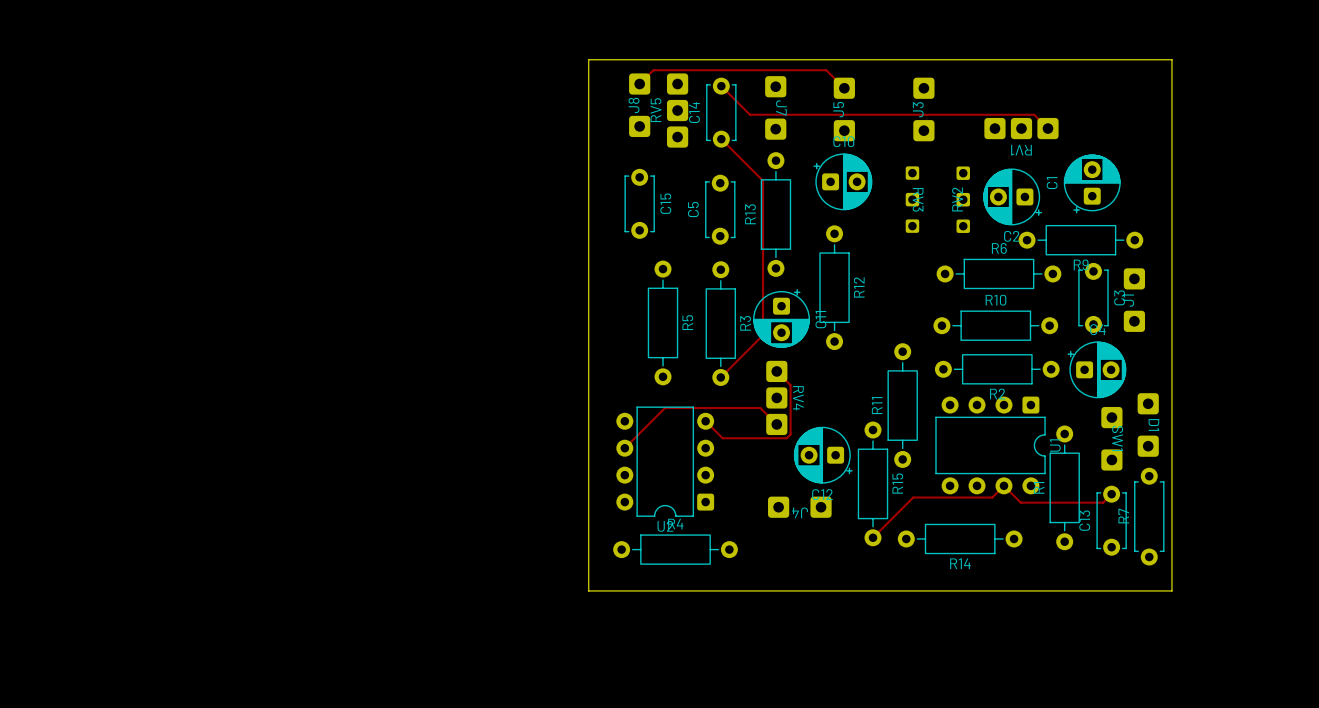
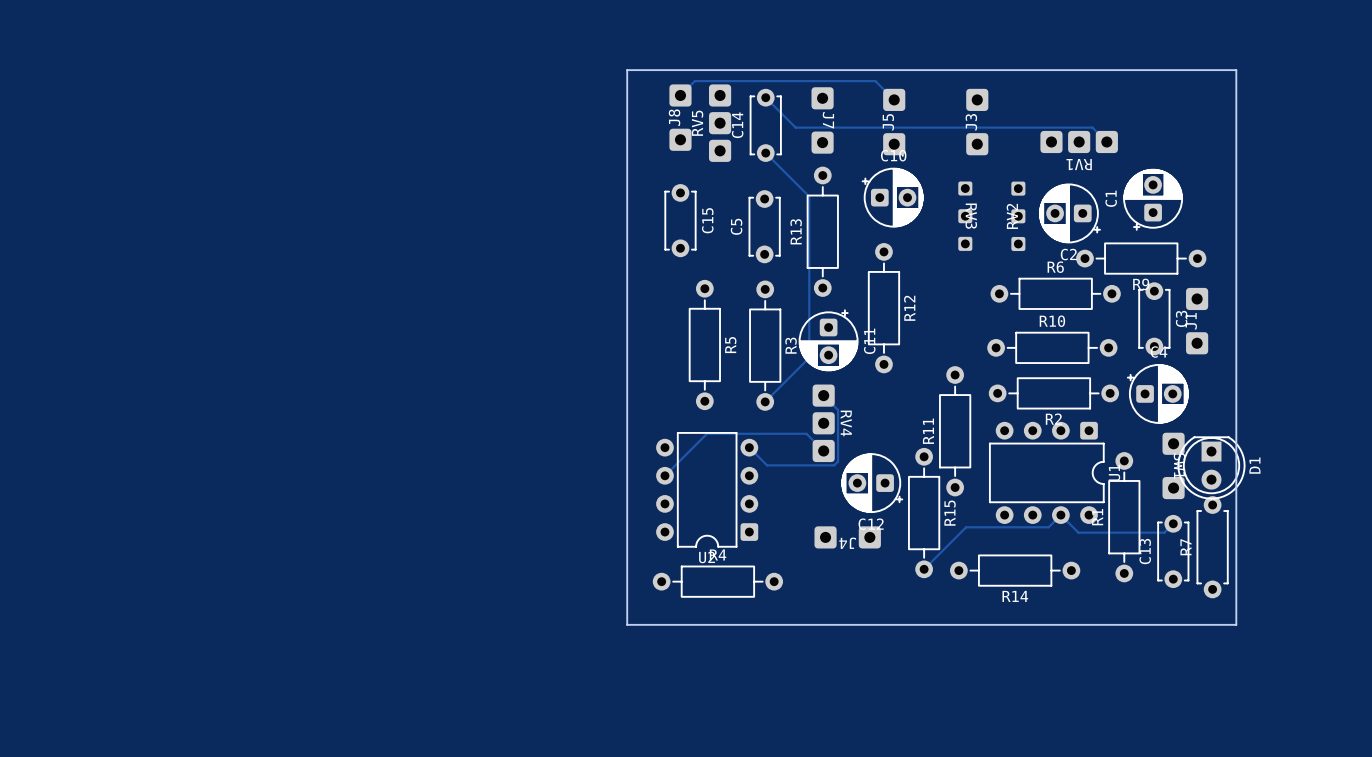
D1 footprint: [1137, 393, 1159, 457] -> [1177, 436, 1246, 500]
D1 name position: D1 (1153, 424) -> D1 (1254, 465)

